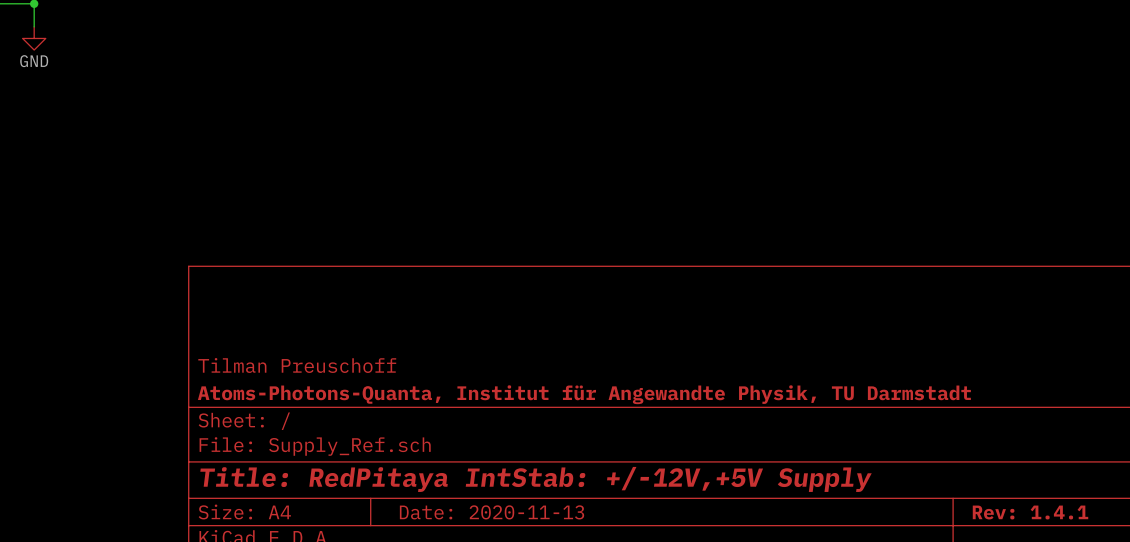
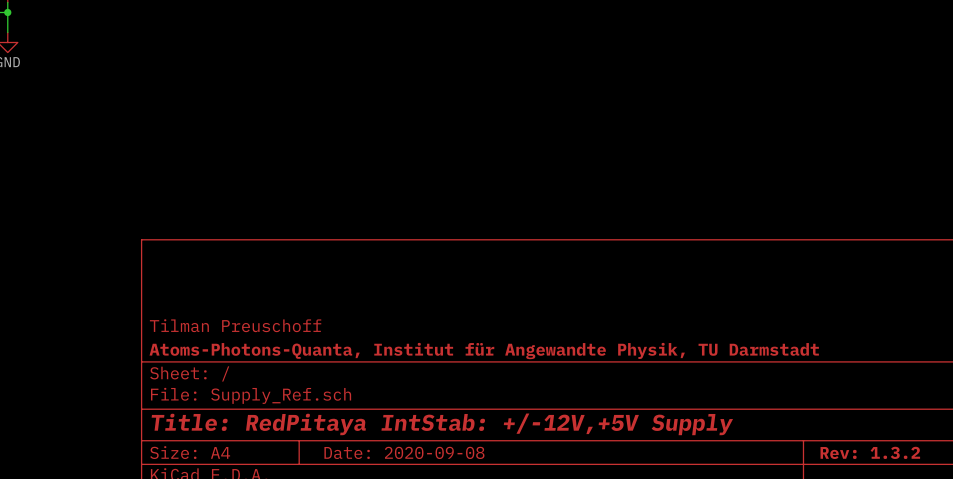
title block: Date: 2020-11-13 (492, 512) -> Date: 2020-09-08 (404, 452)
title block: Rev: 1.4.1 (1030, 512) -> Rev: 1.3.2 (870, 452)

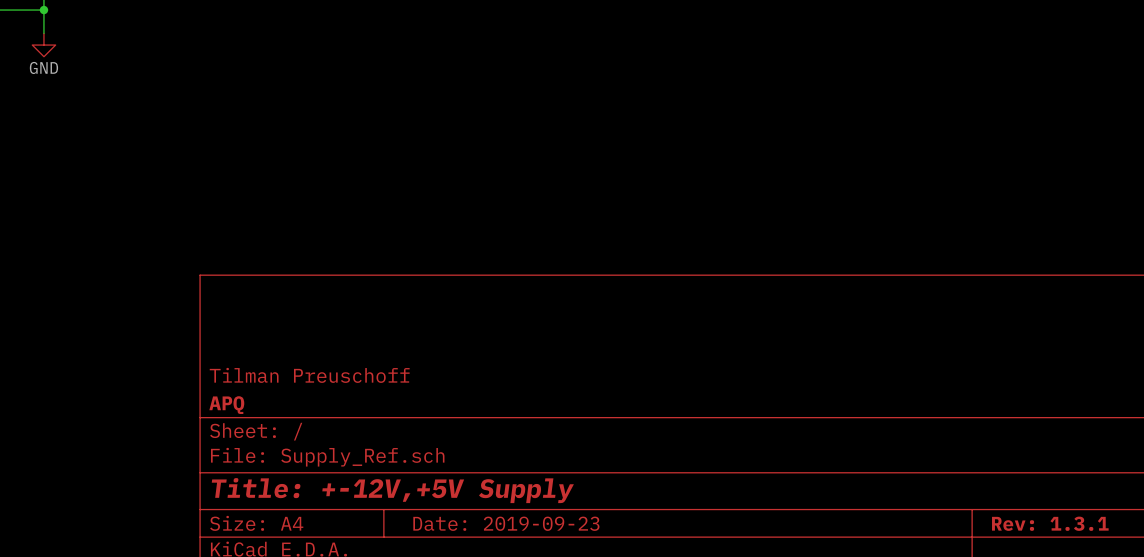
title block: Atoms-Photons-Quanta, Institut für Angewandte Physik, TU Darmstadt (484, 351) -> APQ (226, 405)
title block: Title: RedPitaya IntStab: +/-12V,+5V Supply (442, 424) -> Title: +-12V,+5V Supply (392, 490)
title block: Date: 2020-09-08 (404, 452) -> Date: 2019-09-23 (506, 523)
title block: Rev: 1.3.2 (870, 452) -> Rev: 1.3.1 (1050, 523)

